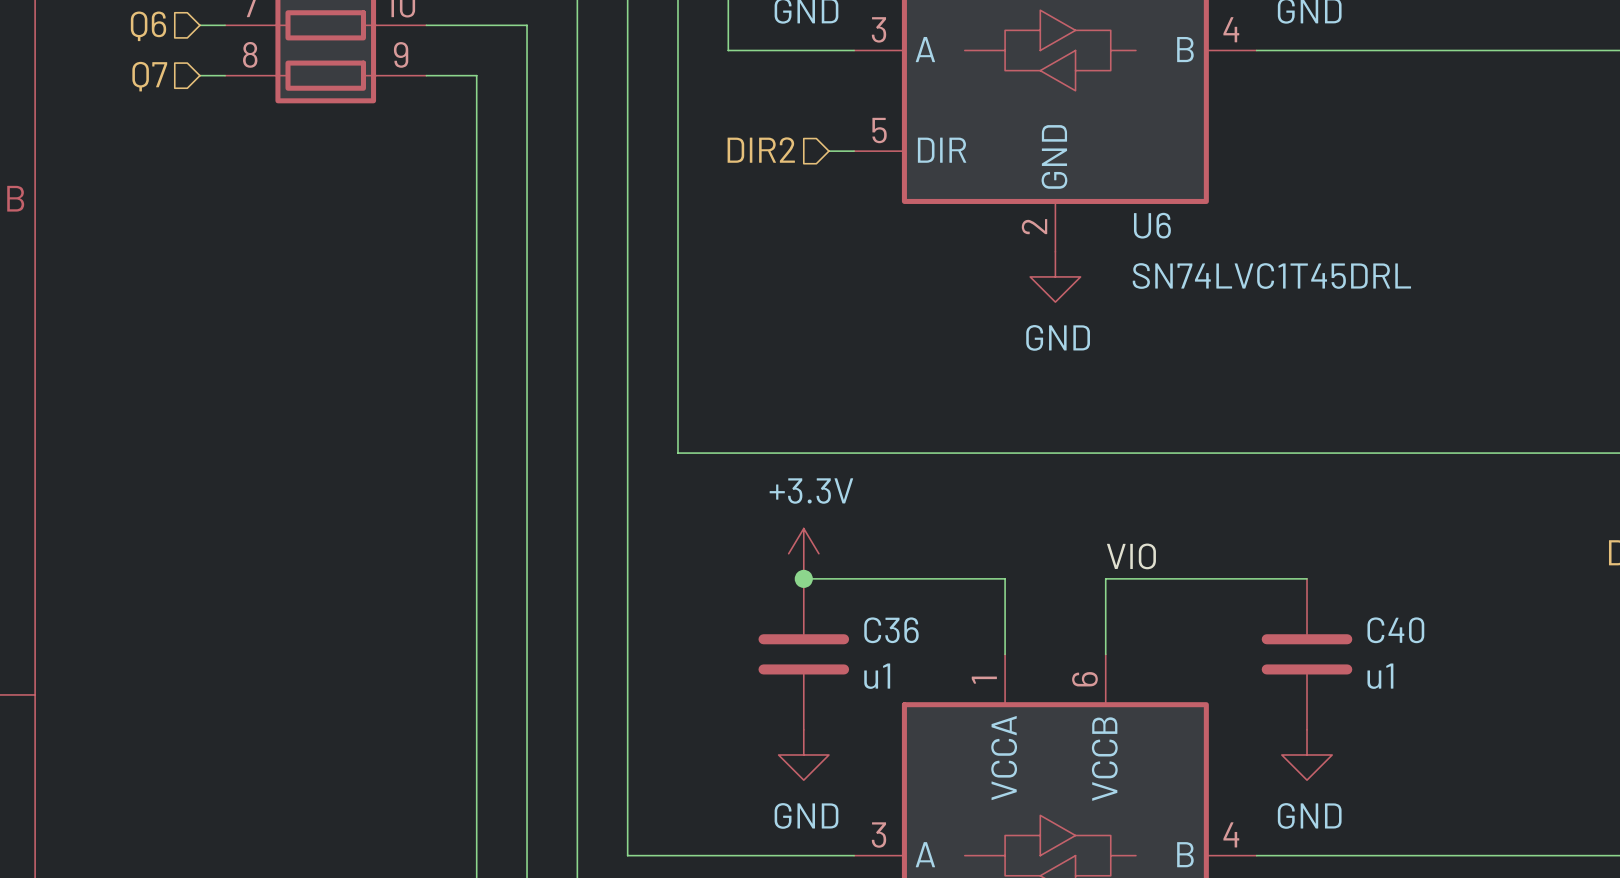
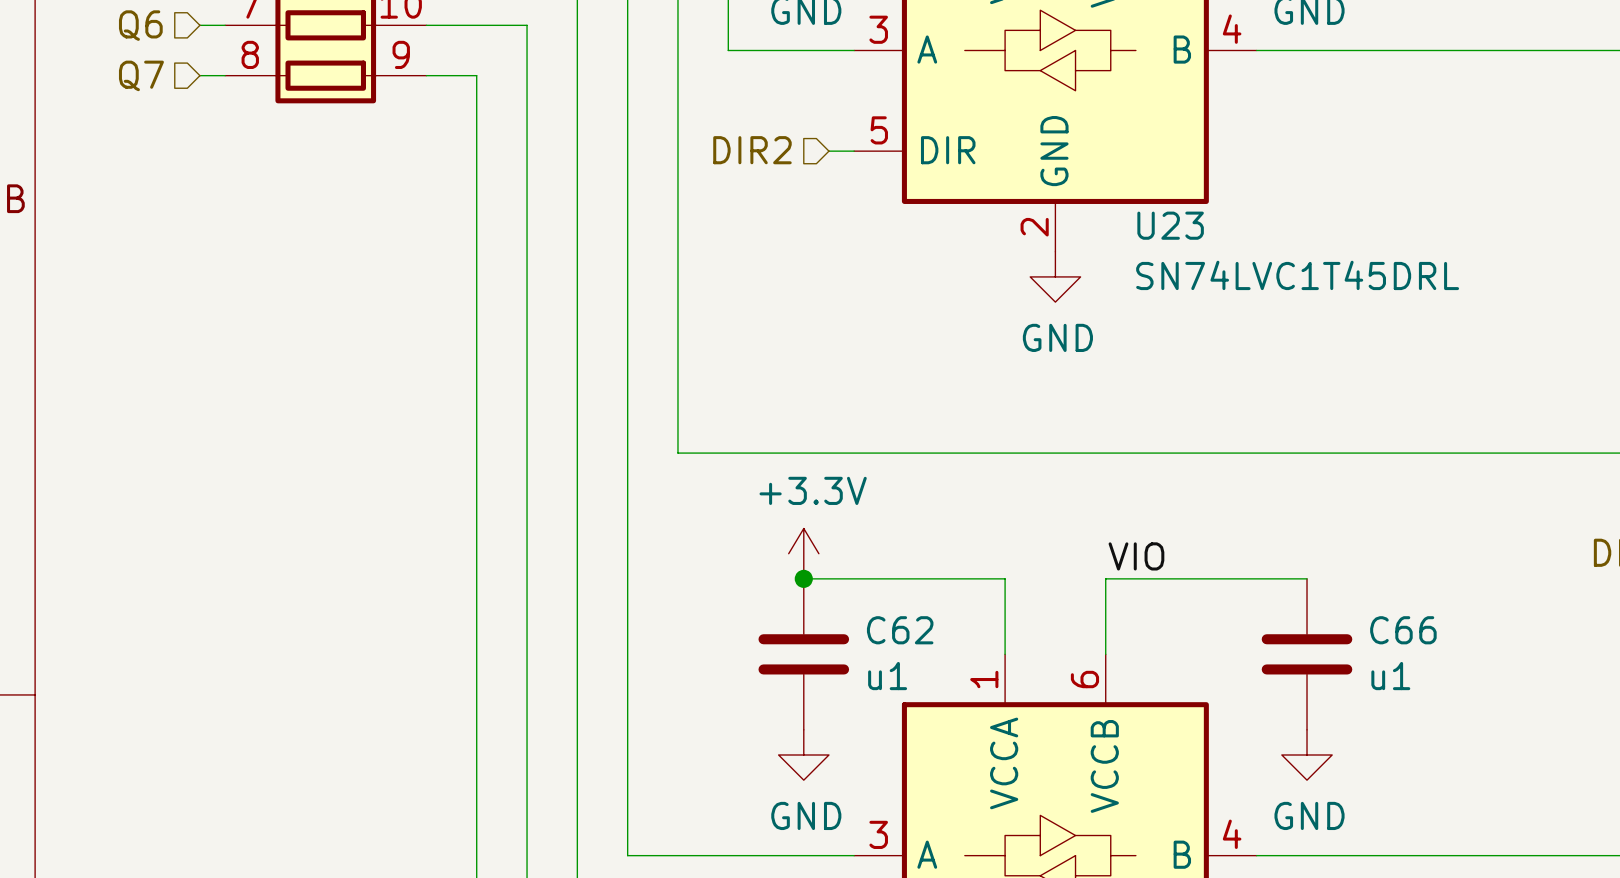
U6 name: U6 (1152, 225) -> U23 (1170, 225)
C36 name: C36 (891, 630) -> C62 (900, 630)
C40 name: C40 (1395, 630) -> C66 (1403, 630)

